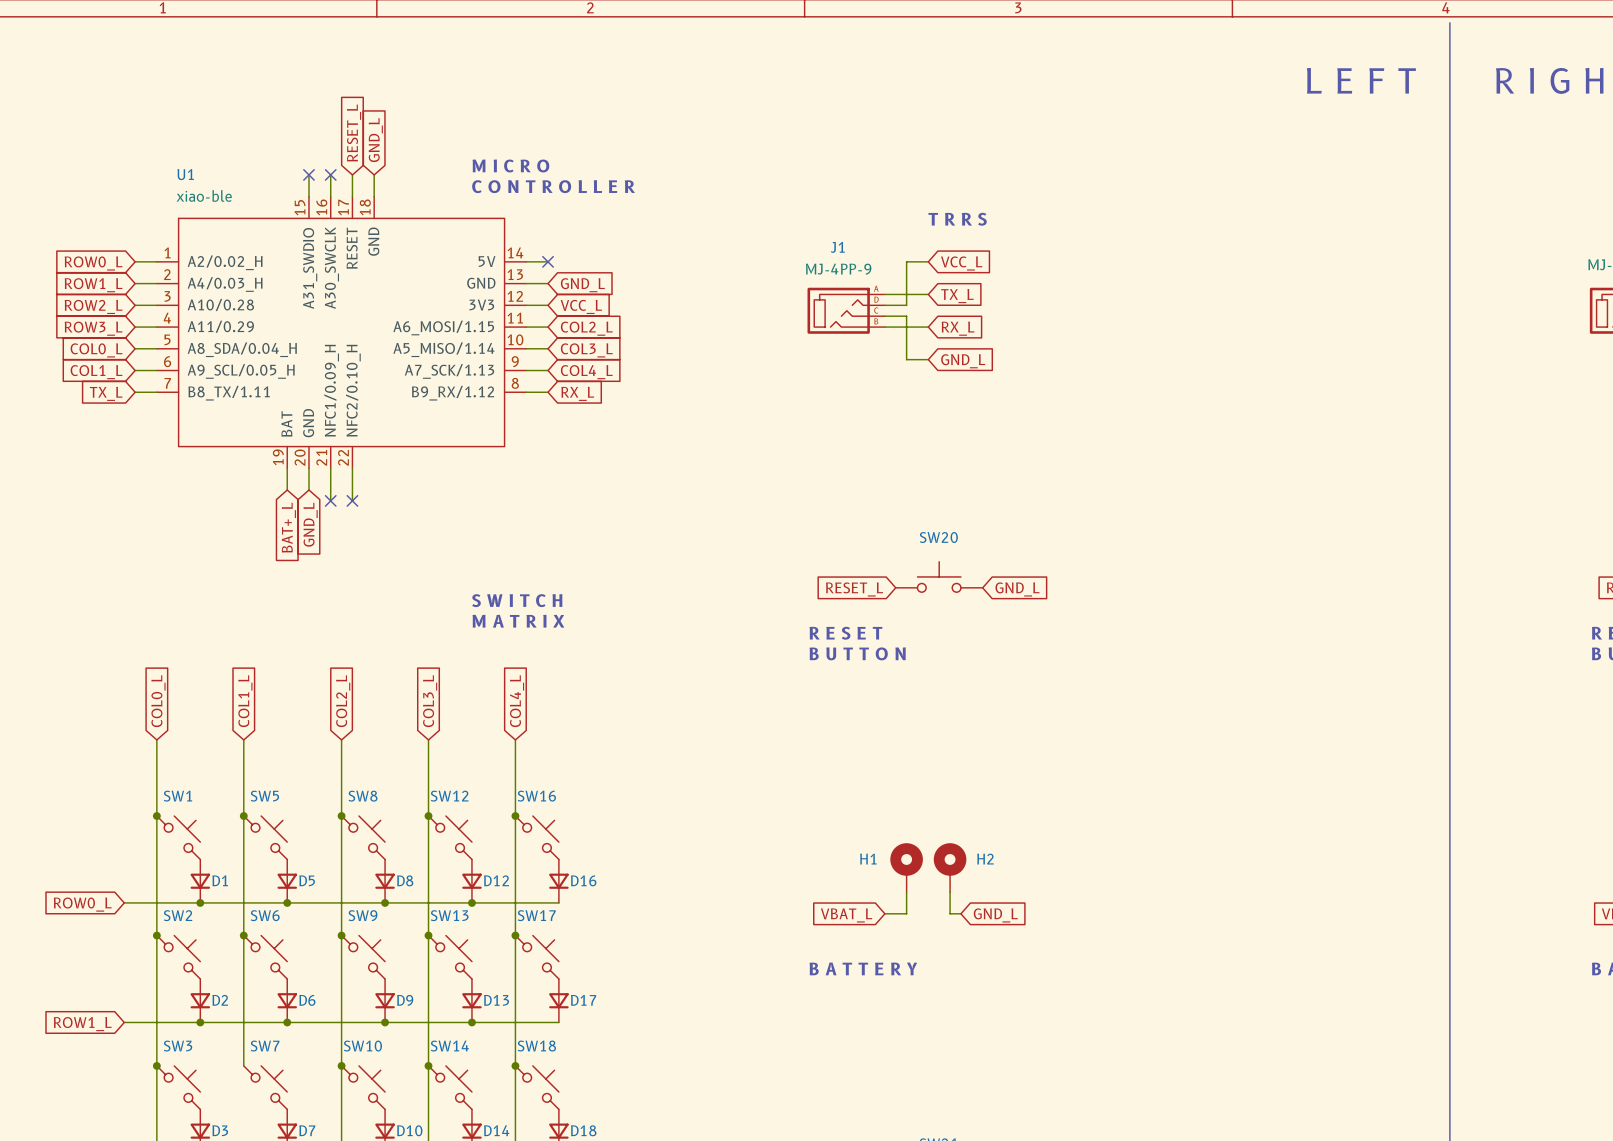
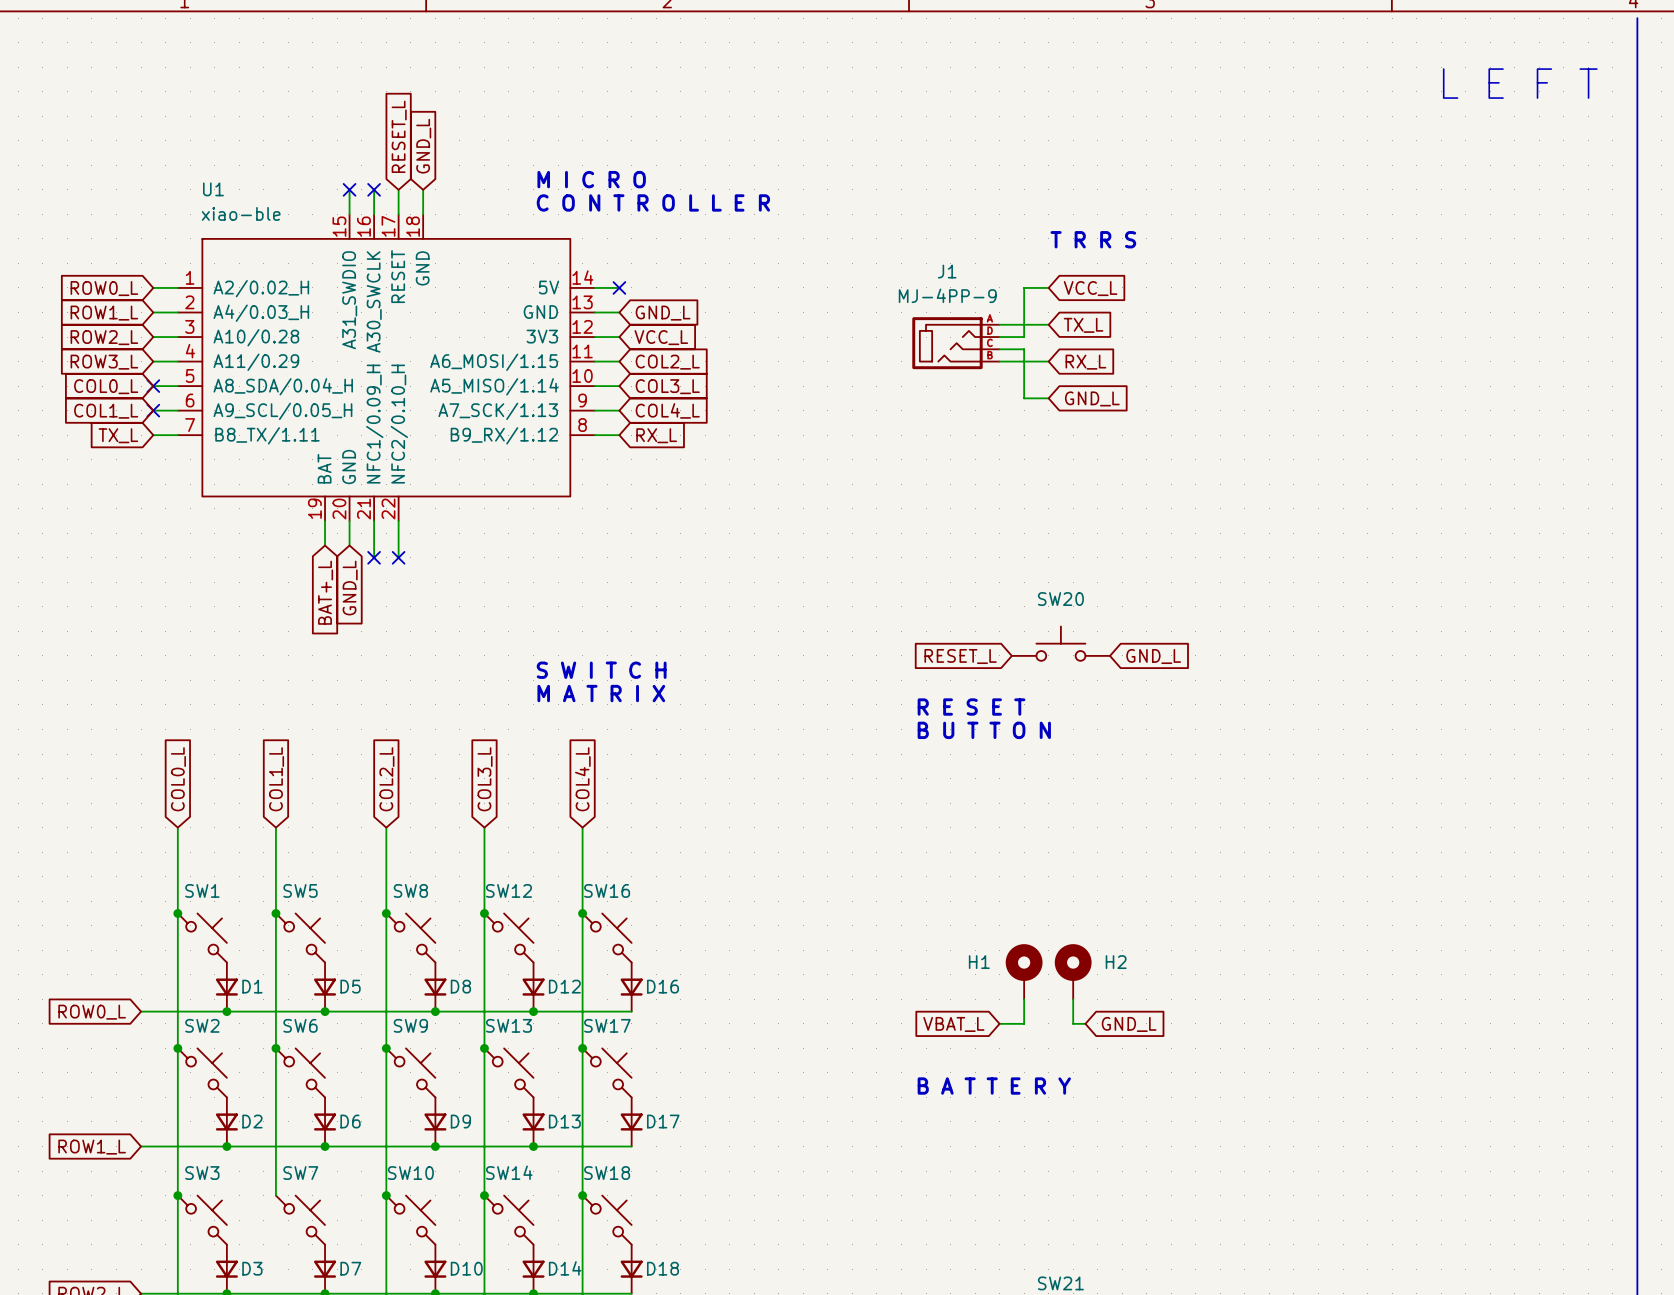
no-connect mark: none -> (153, 386)
no-connect mark: none -> (153, 410)

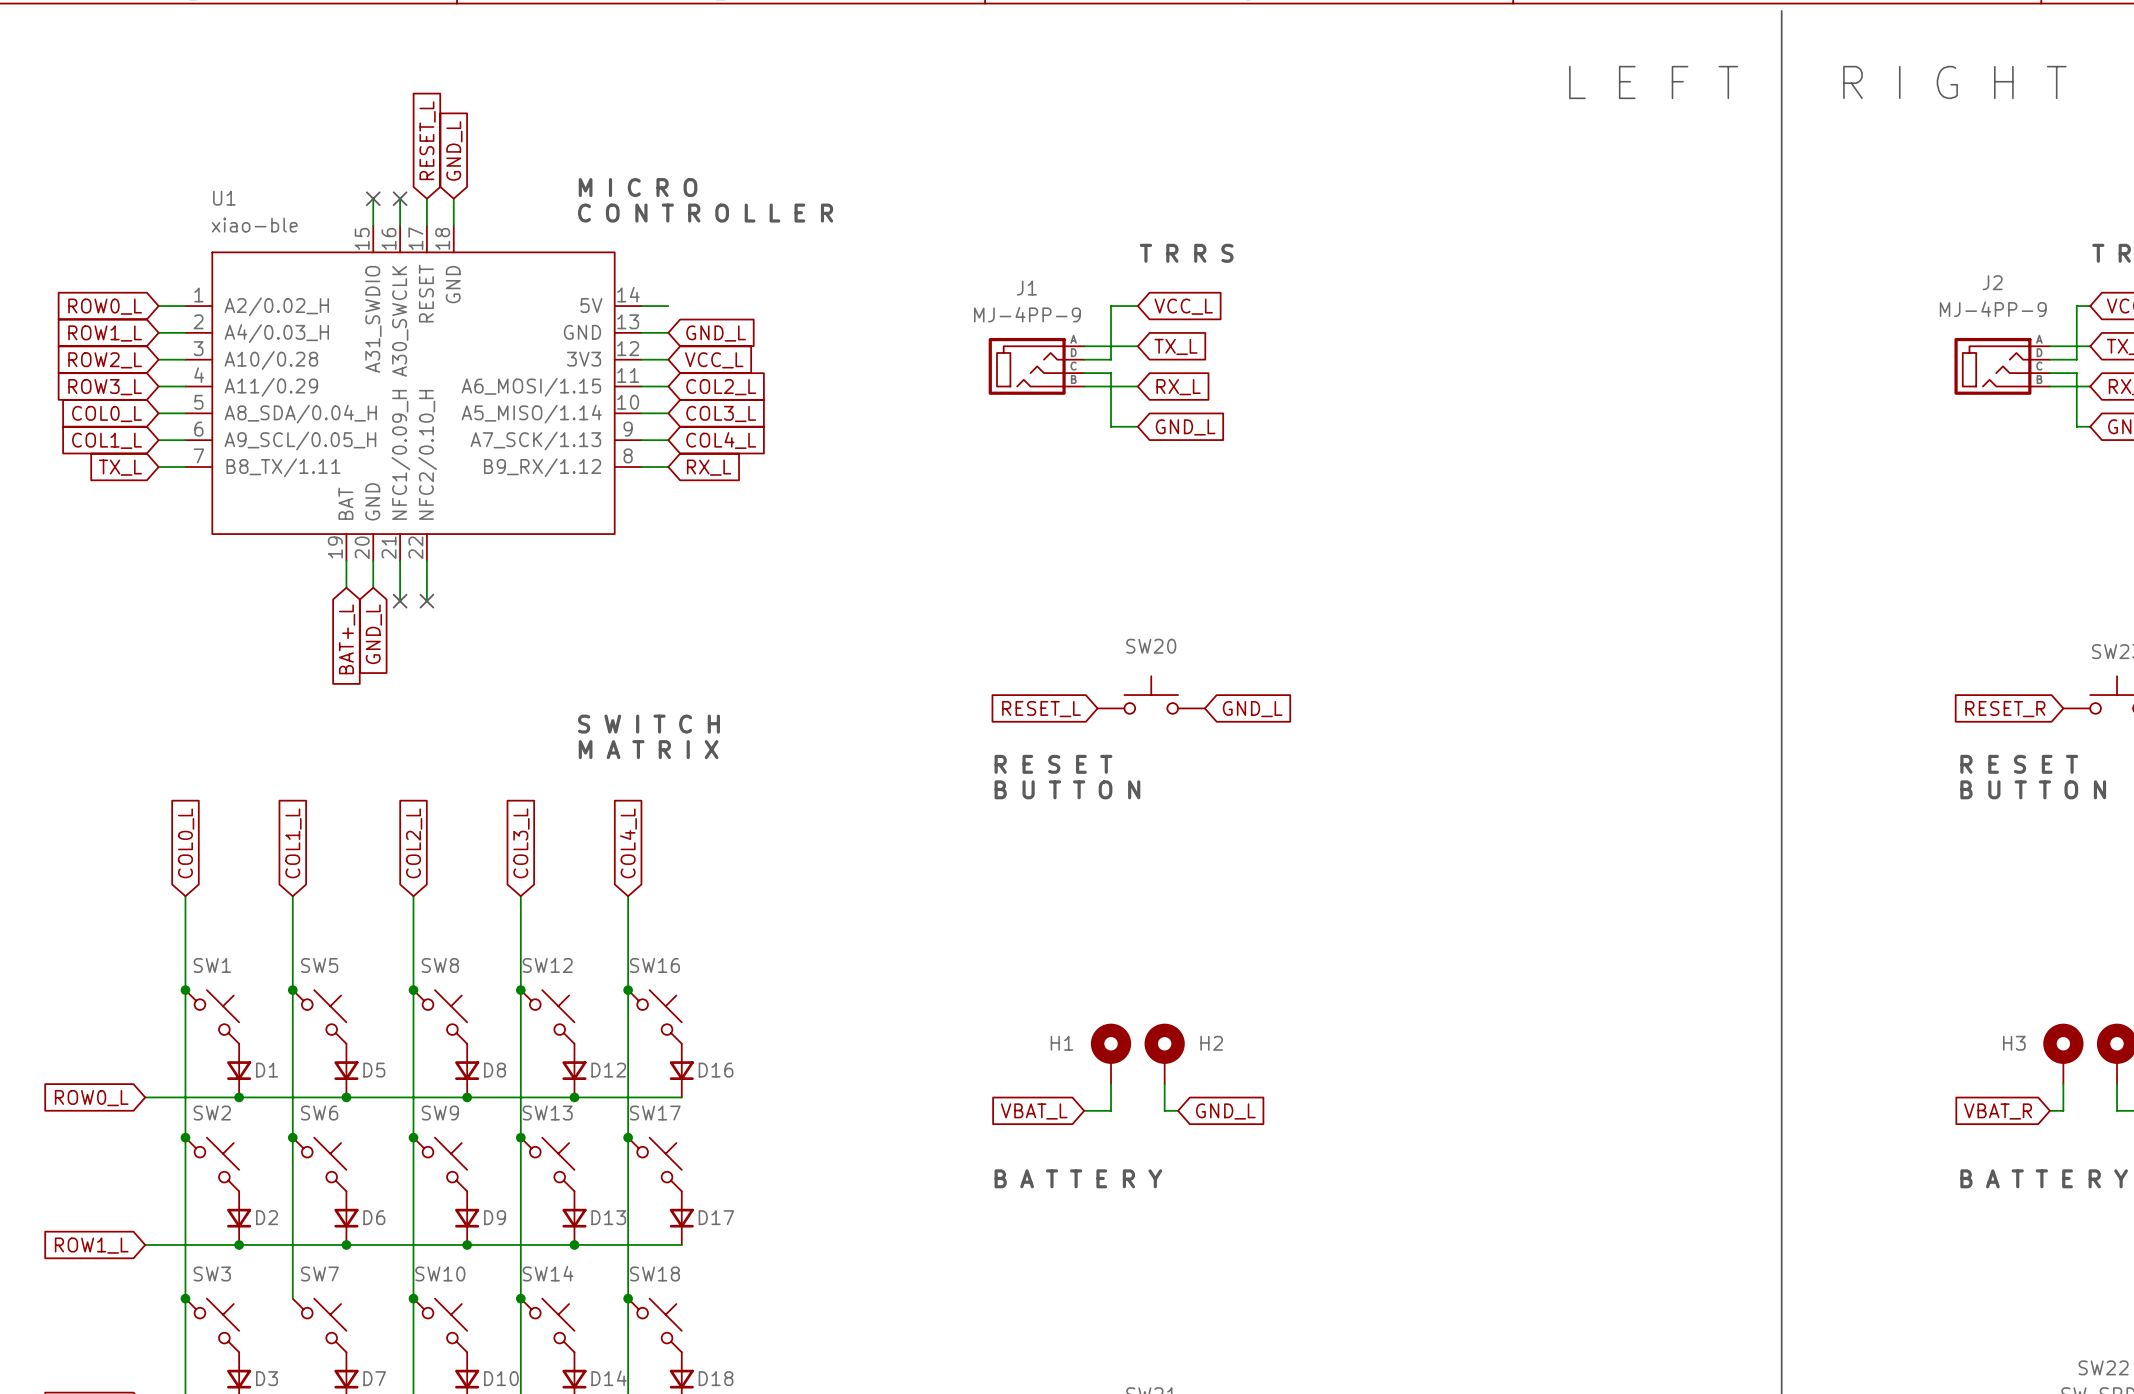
no-connect mark: (619, 287) -> none
no-connect mark: (153, 386) -> none
no-connect mark: (153, 410) -> none

